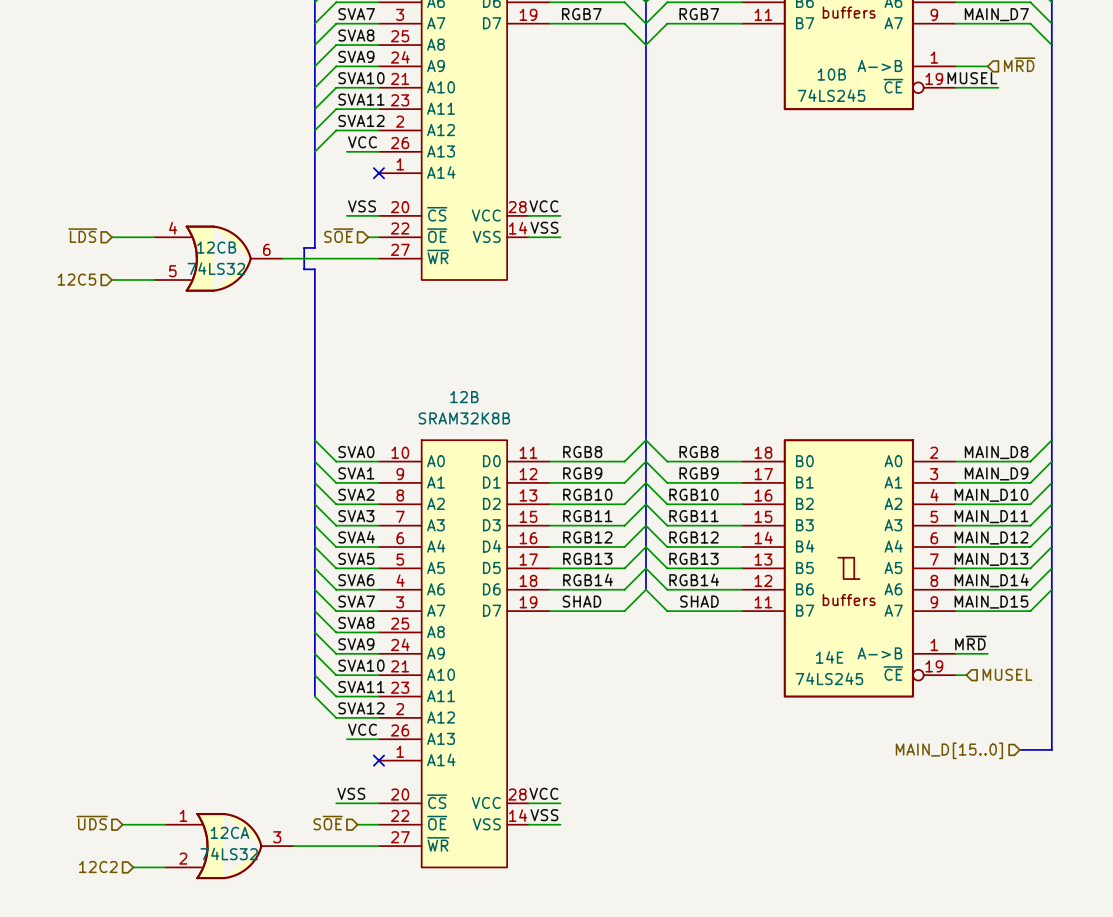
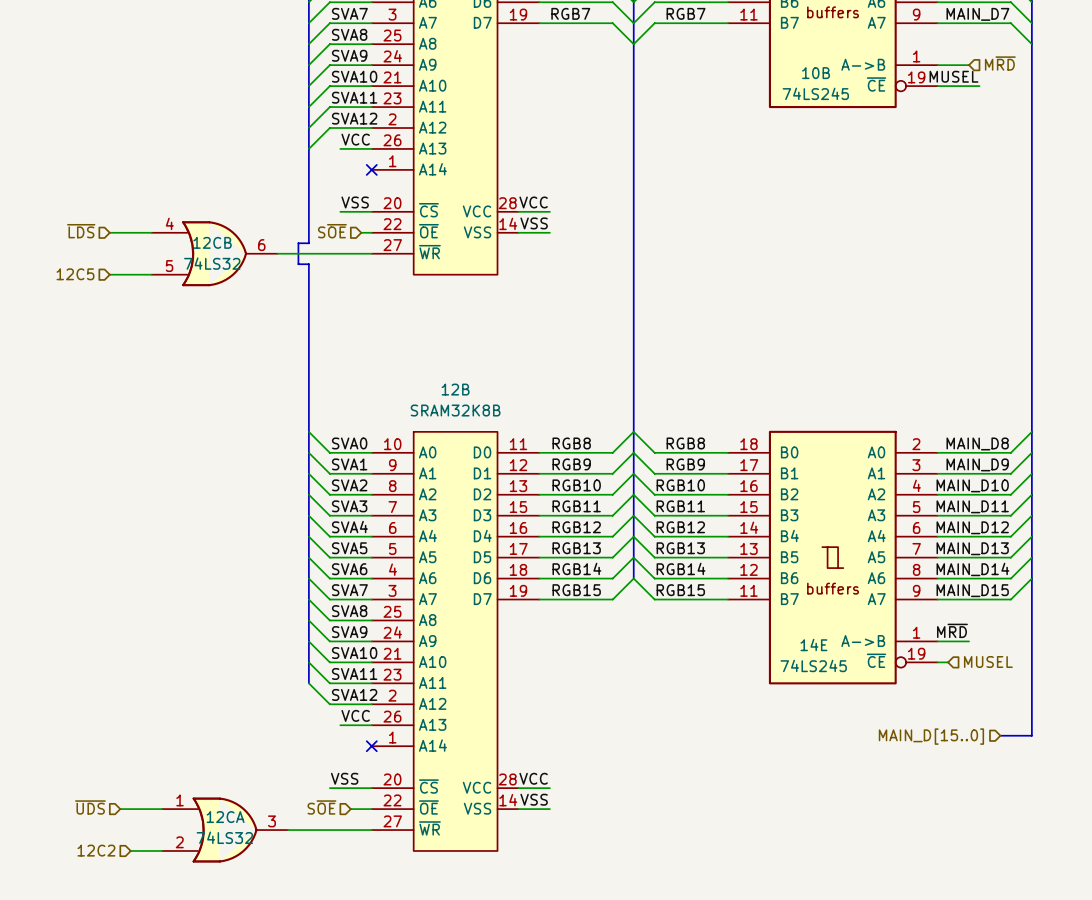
label: SHAD (581, 601) -> RGB15 (576, 590)
label: none -> RGB15 (680, 590)
label: SHAD (699, 601) -> none

